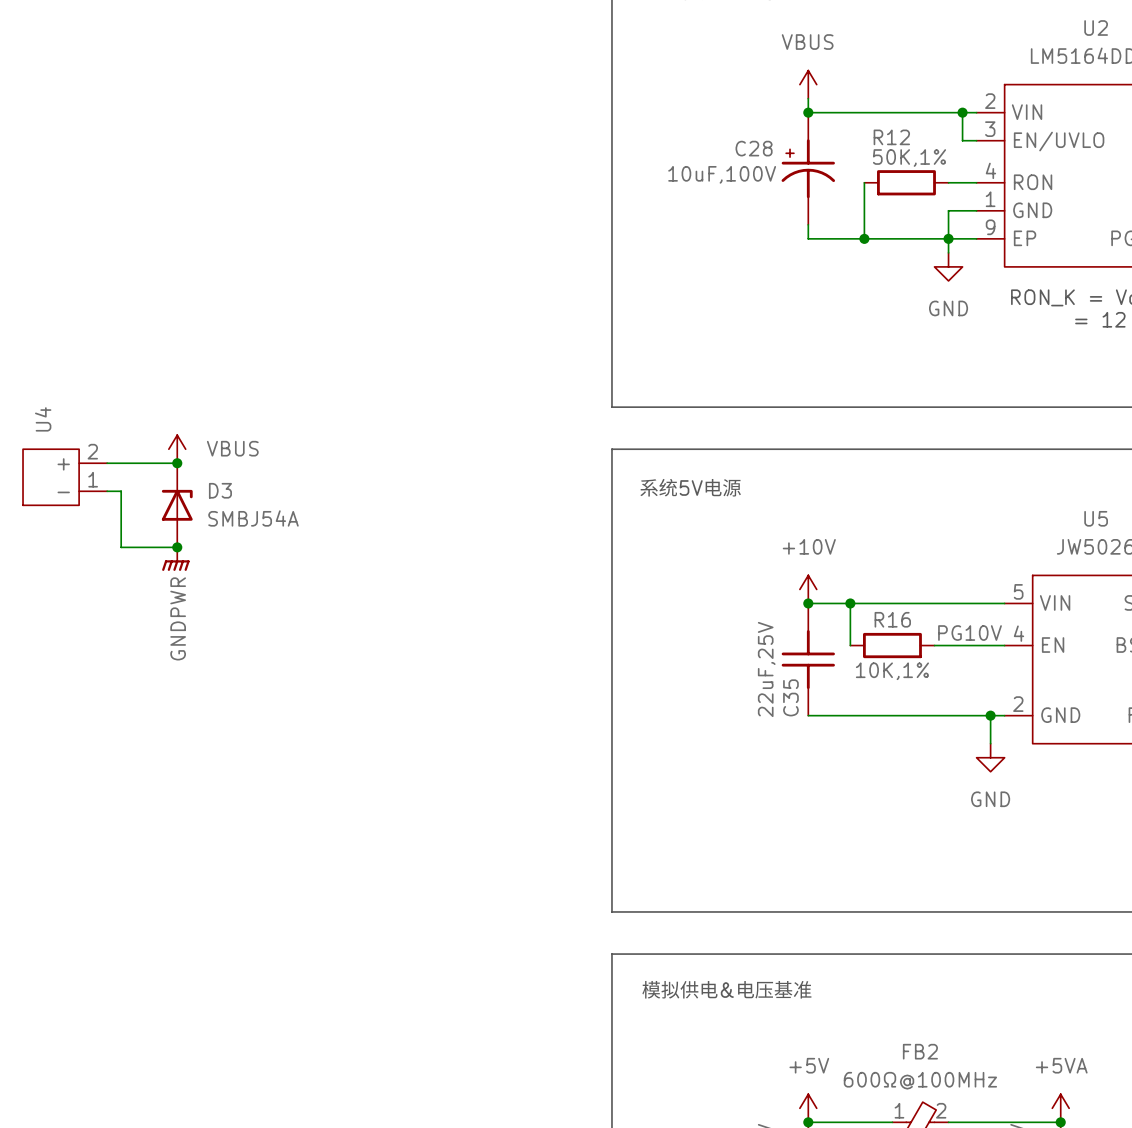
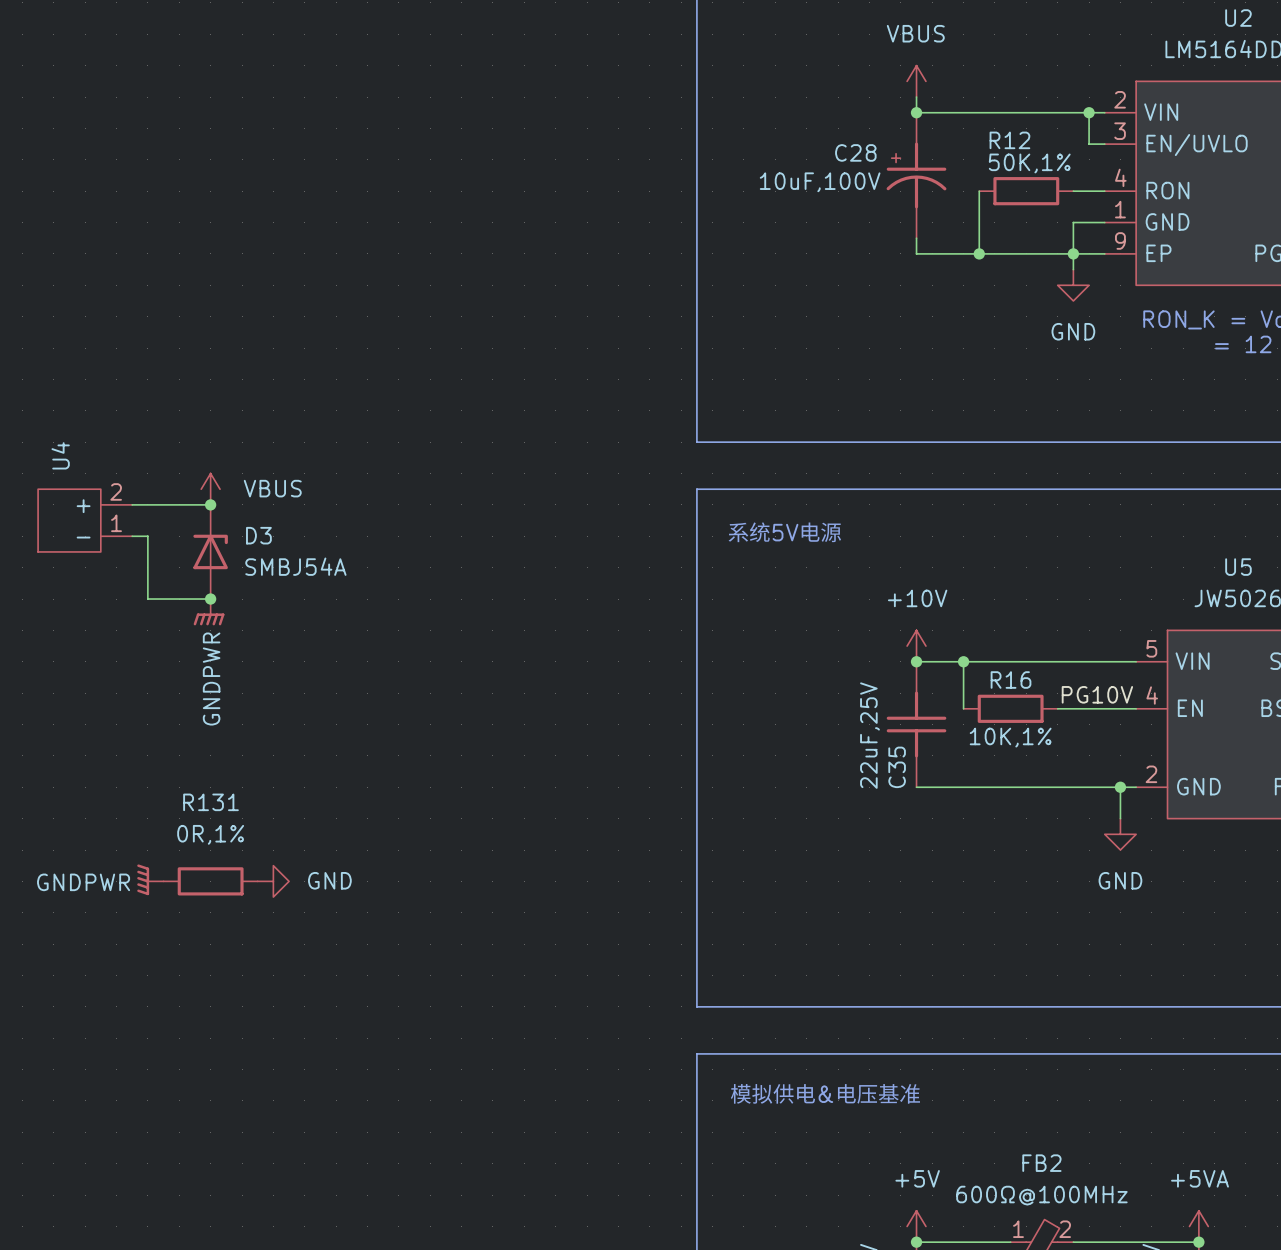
power symbol: none -> GNDPWR (150, 879)
R131: none -> 0R,1% (210, 881)
power symbol: none -> GND (273, 881)

